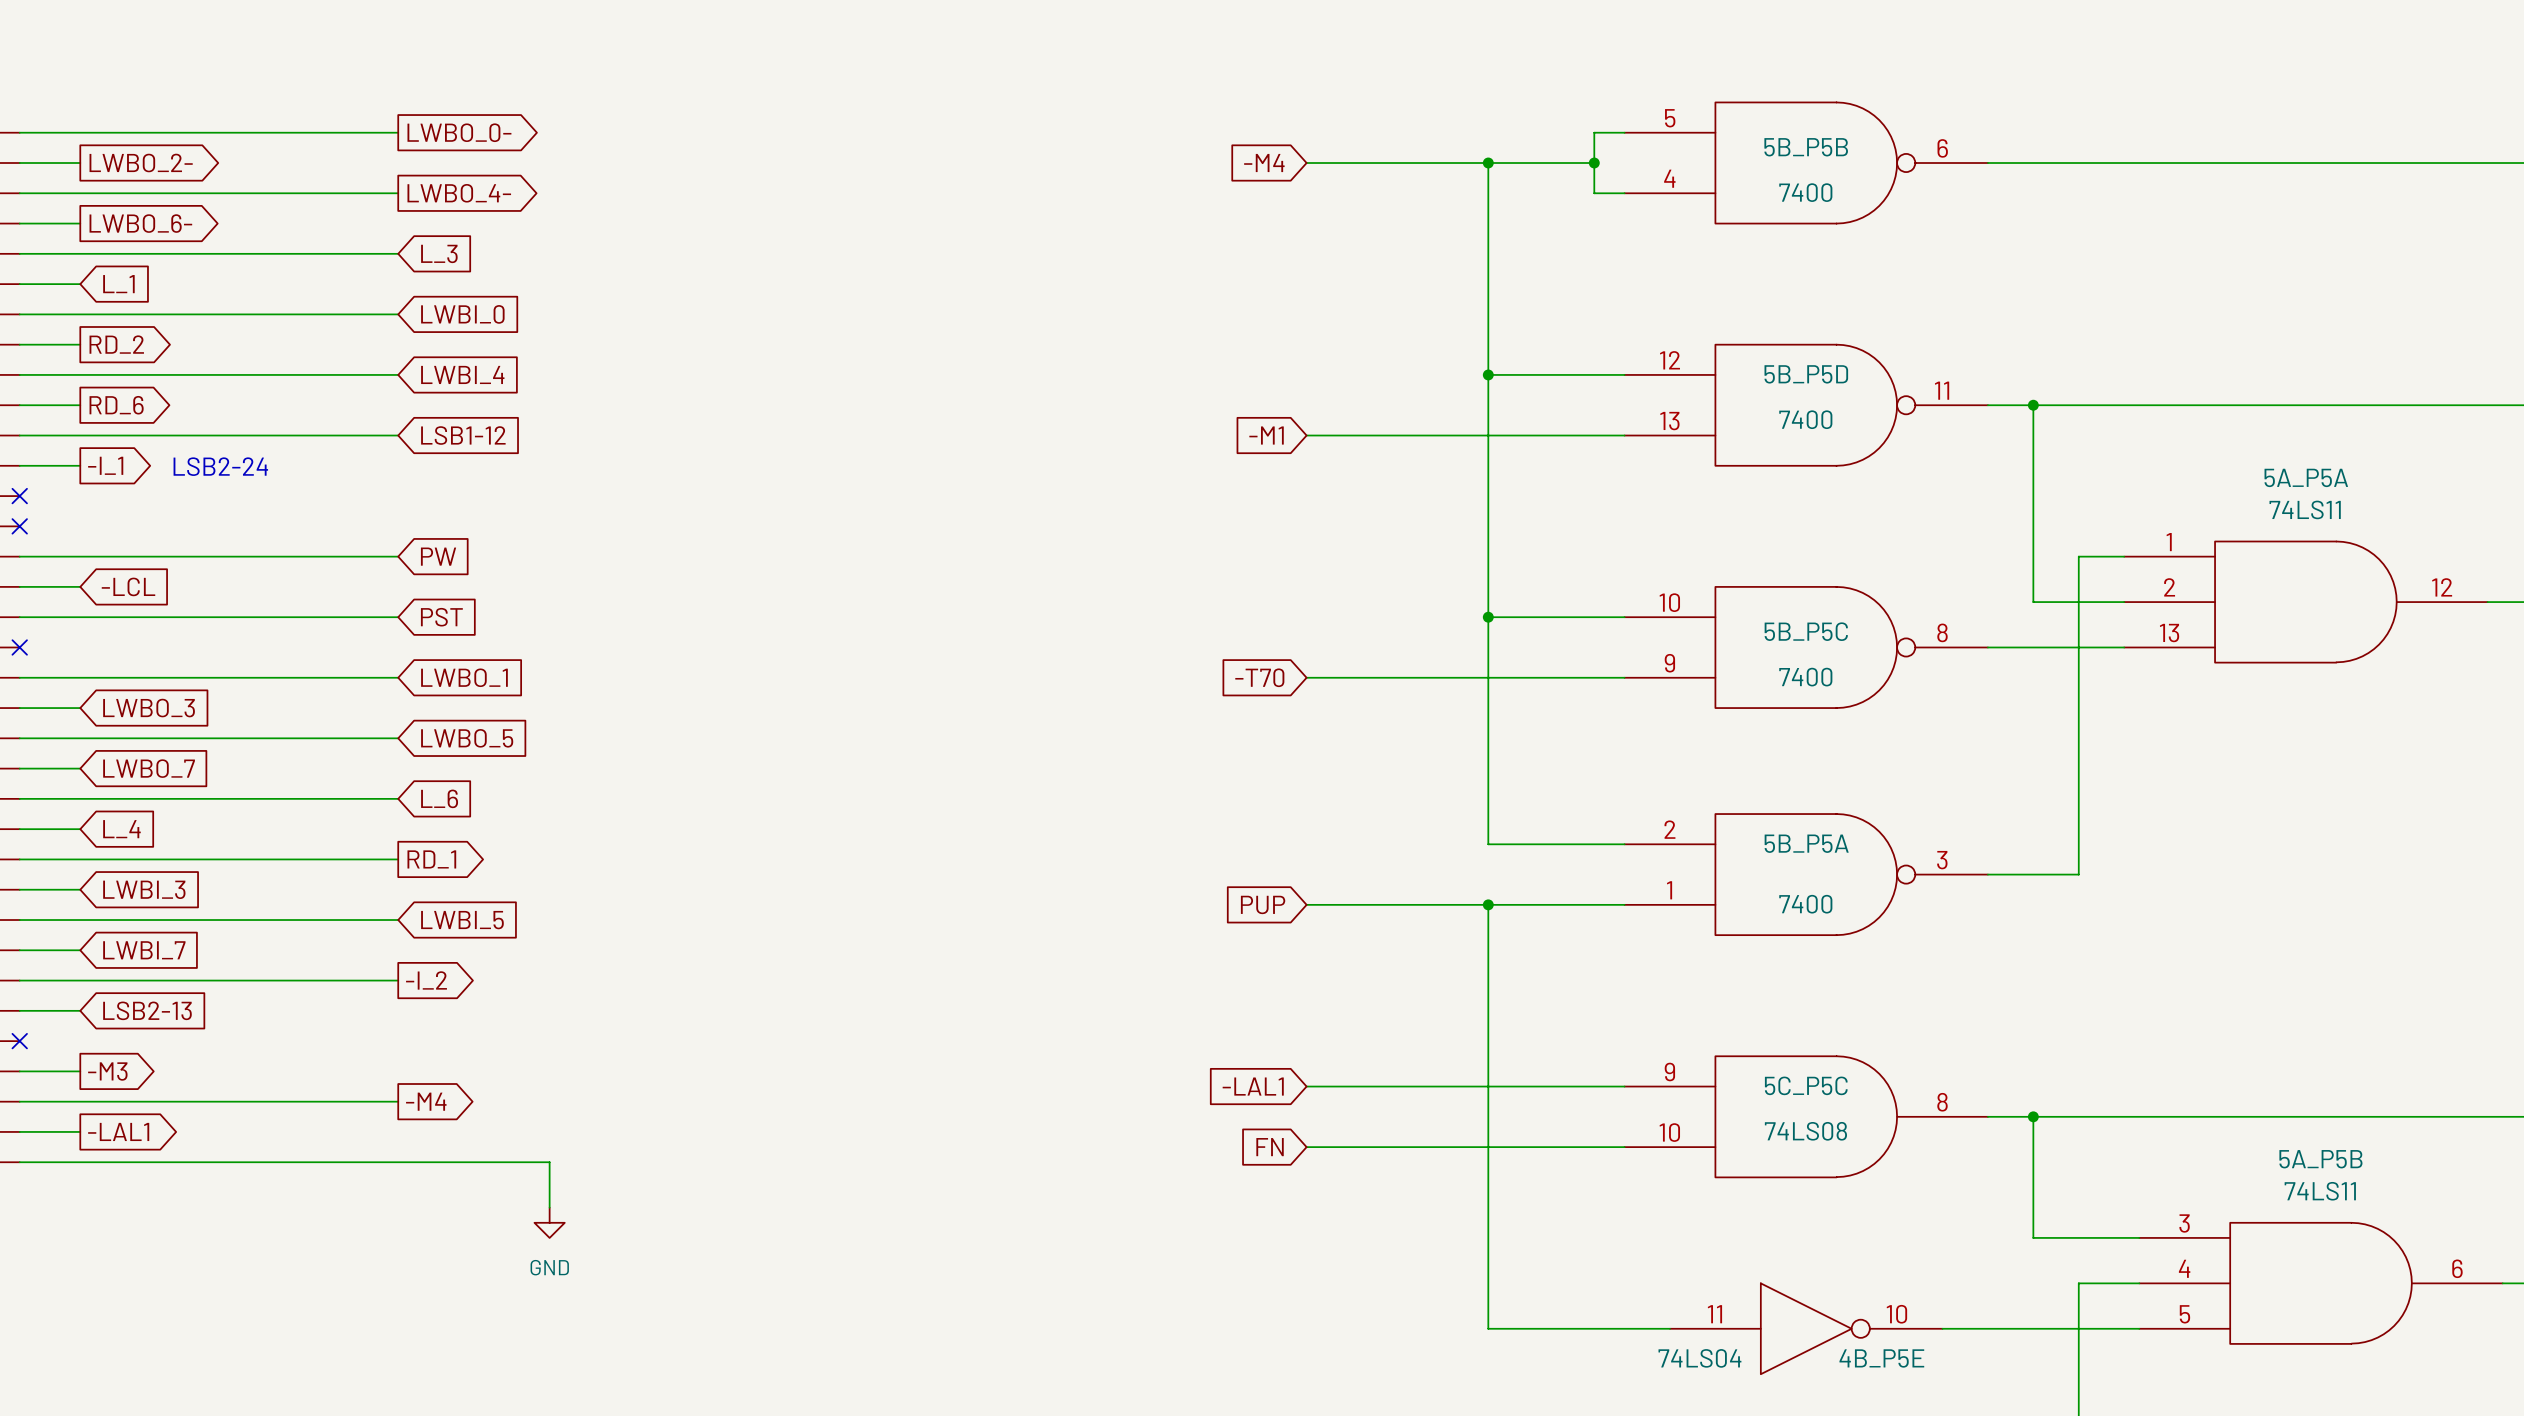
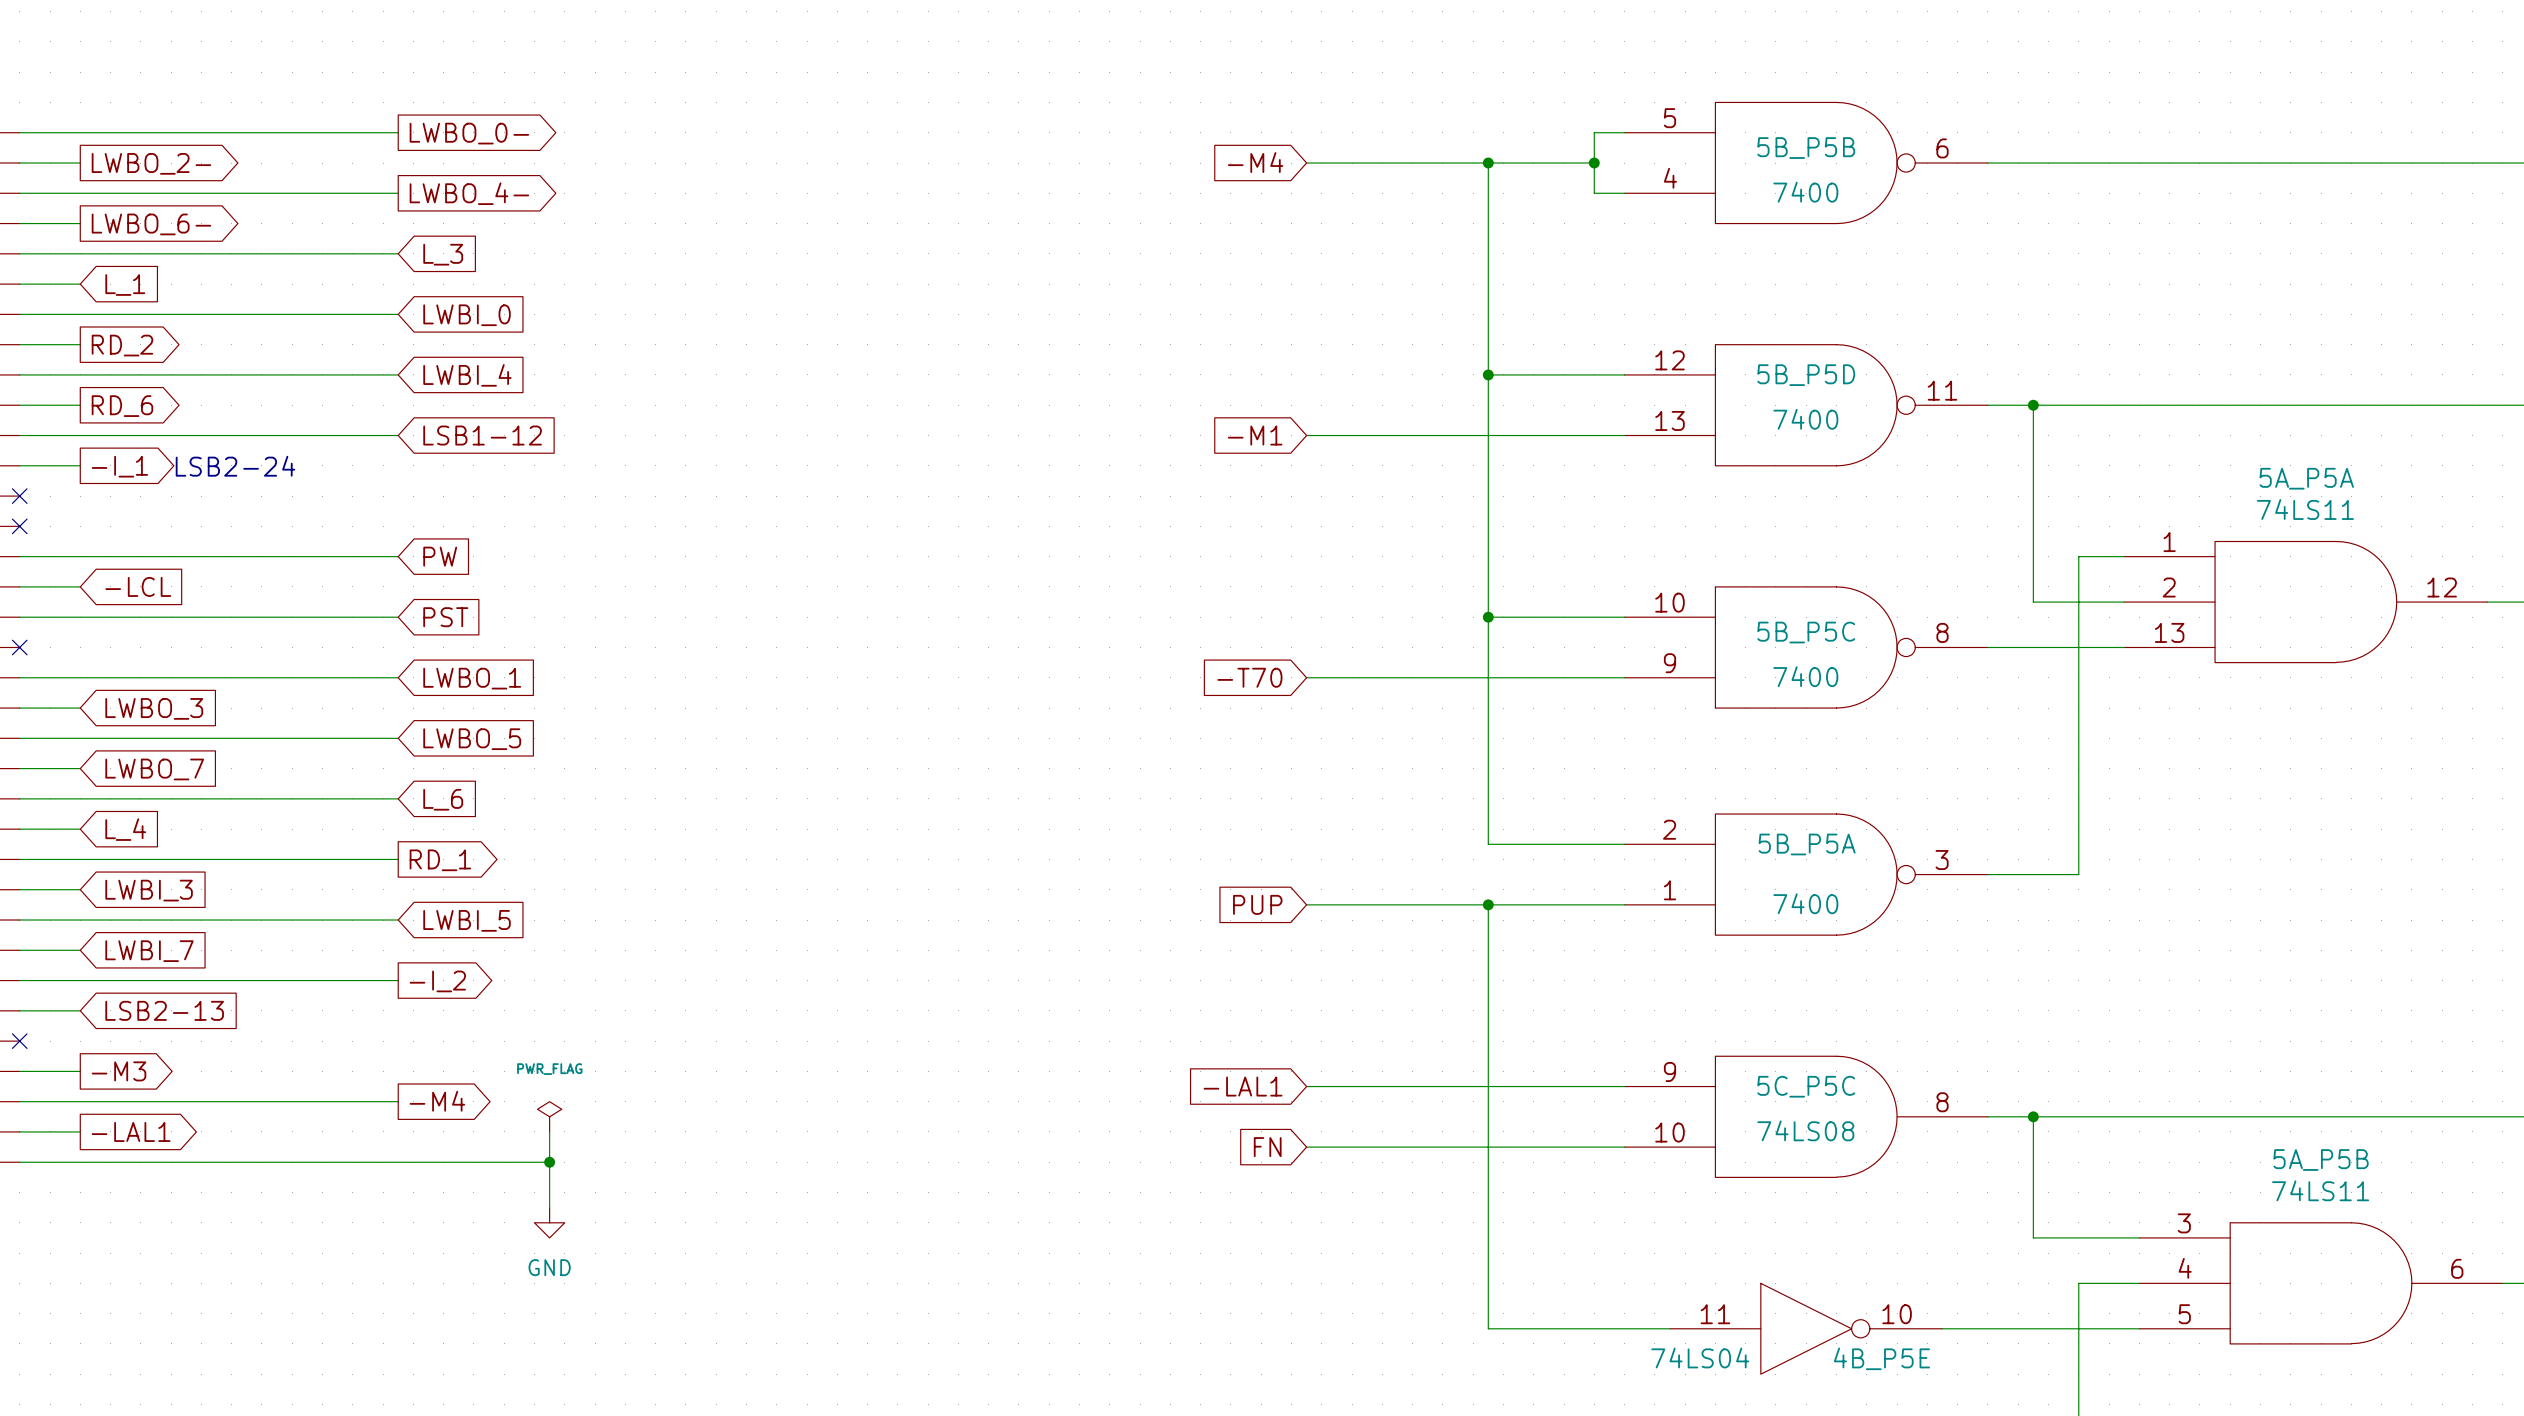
power symbol: none -> PWR_FLAG (549, 1116)
wire: none -> (549, 1131) (549, 1162)
junction: none -> (549, 1162)

